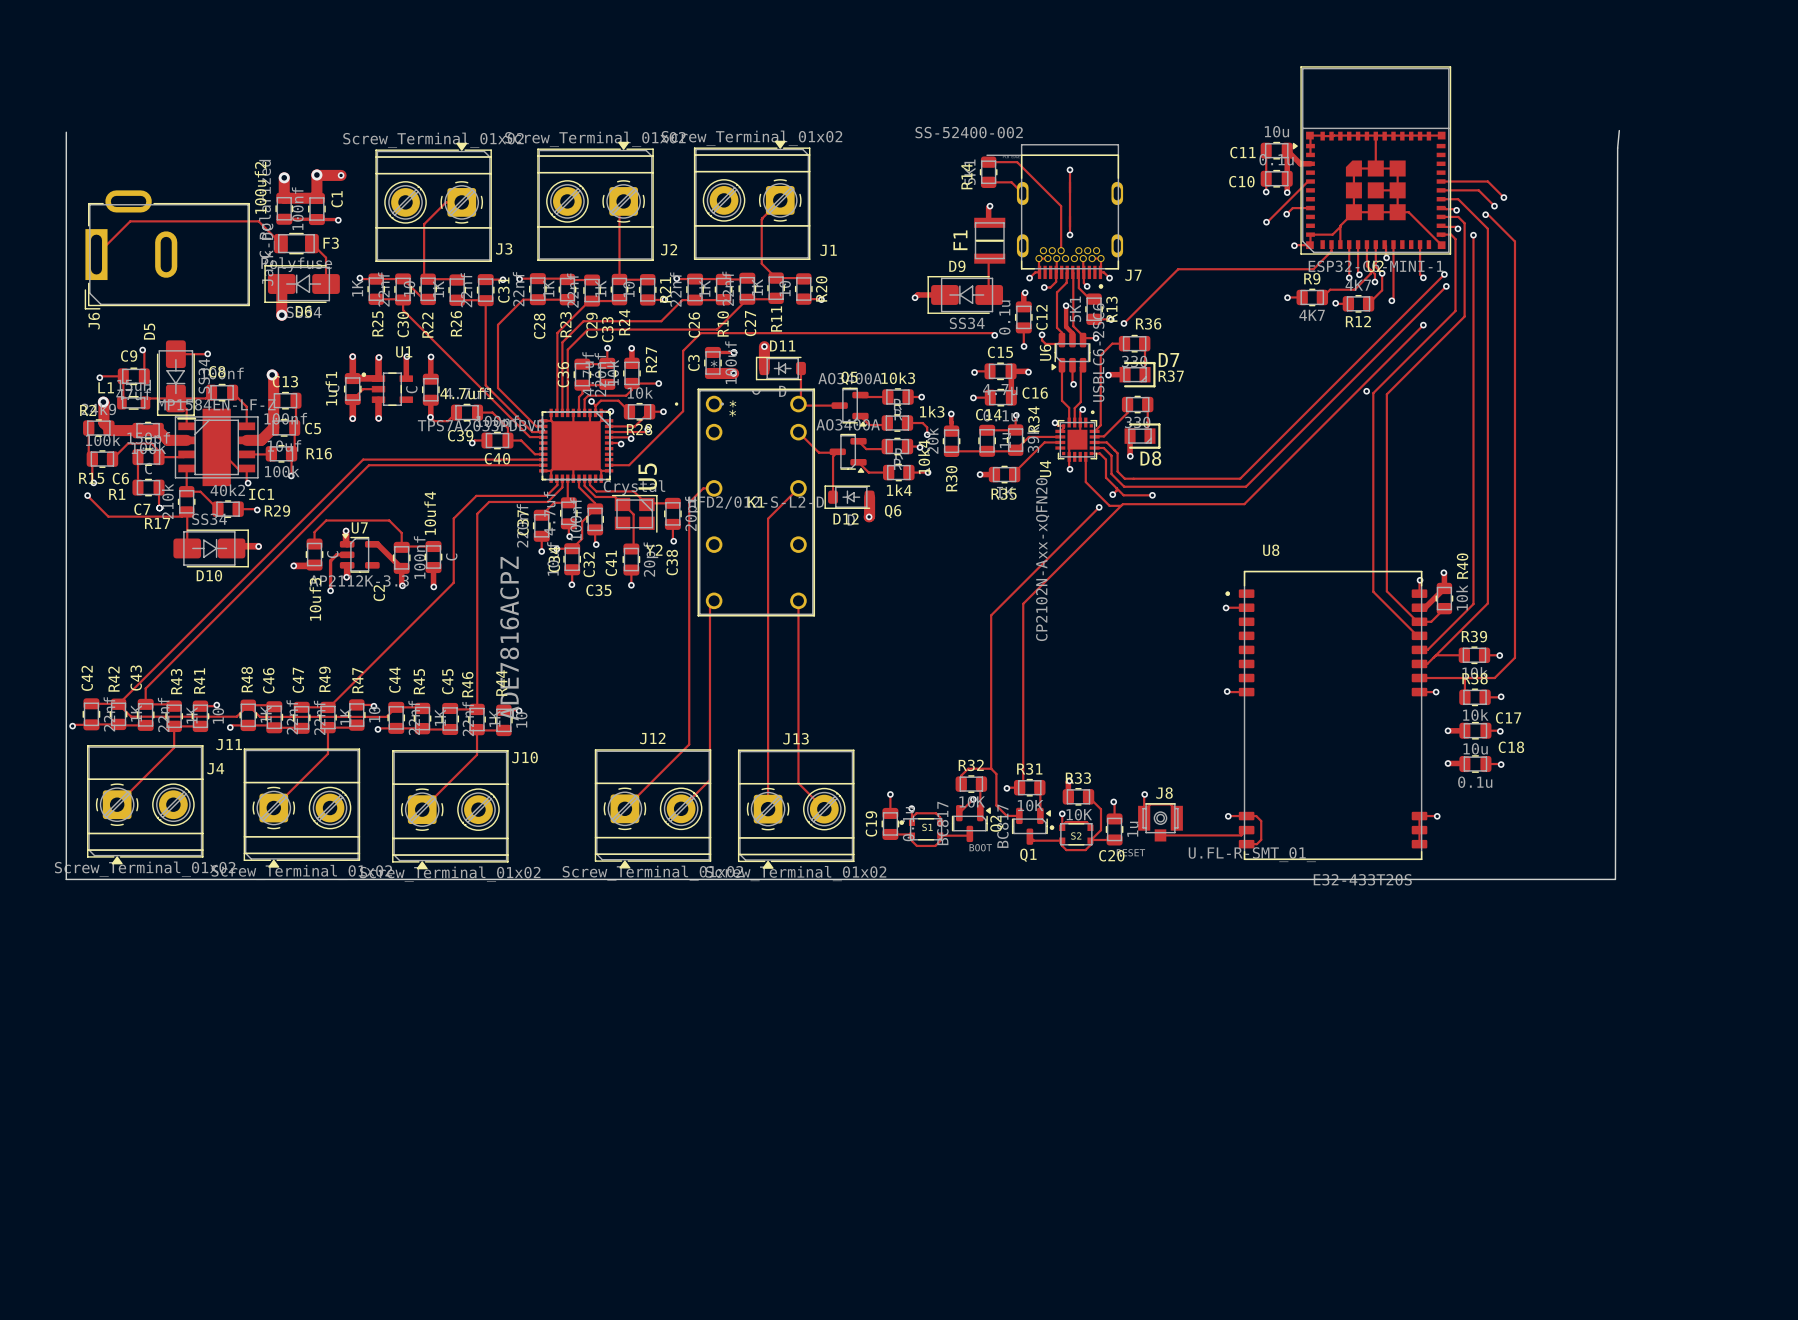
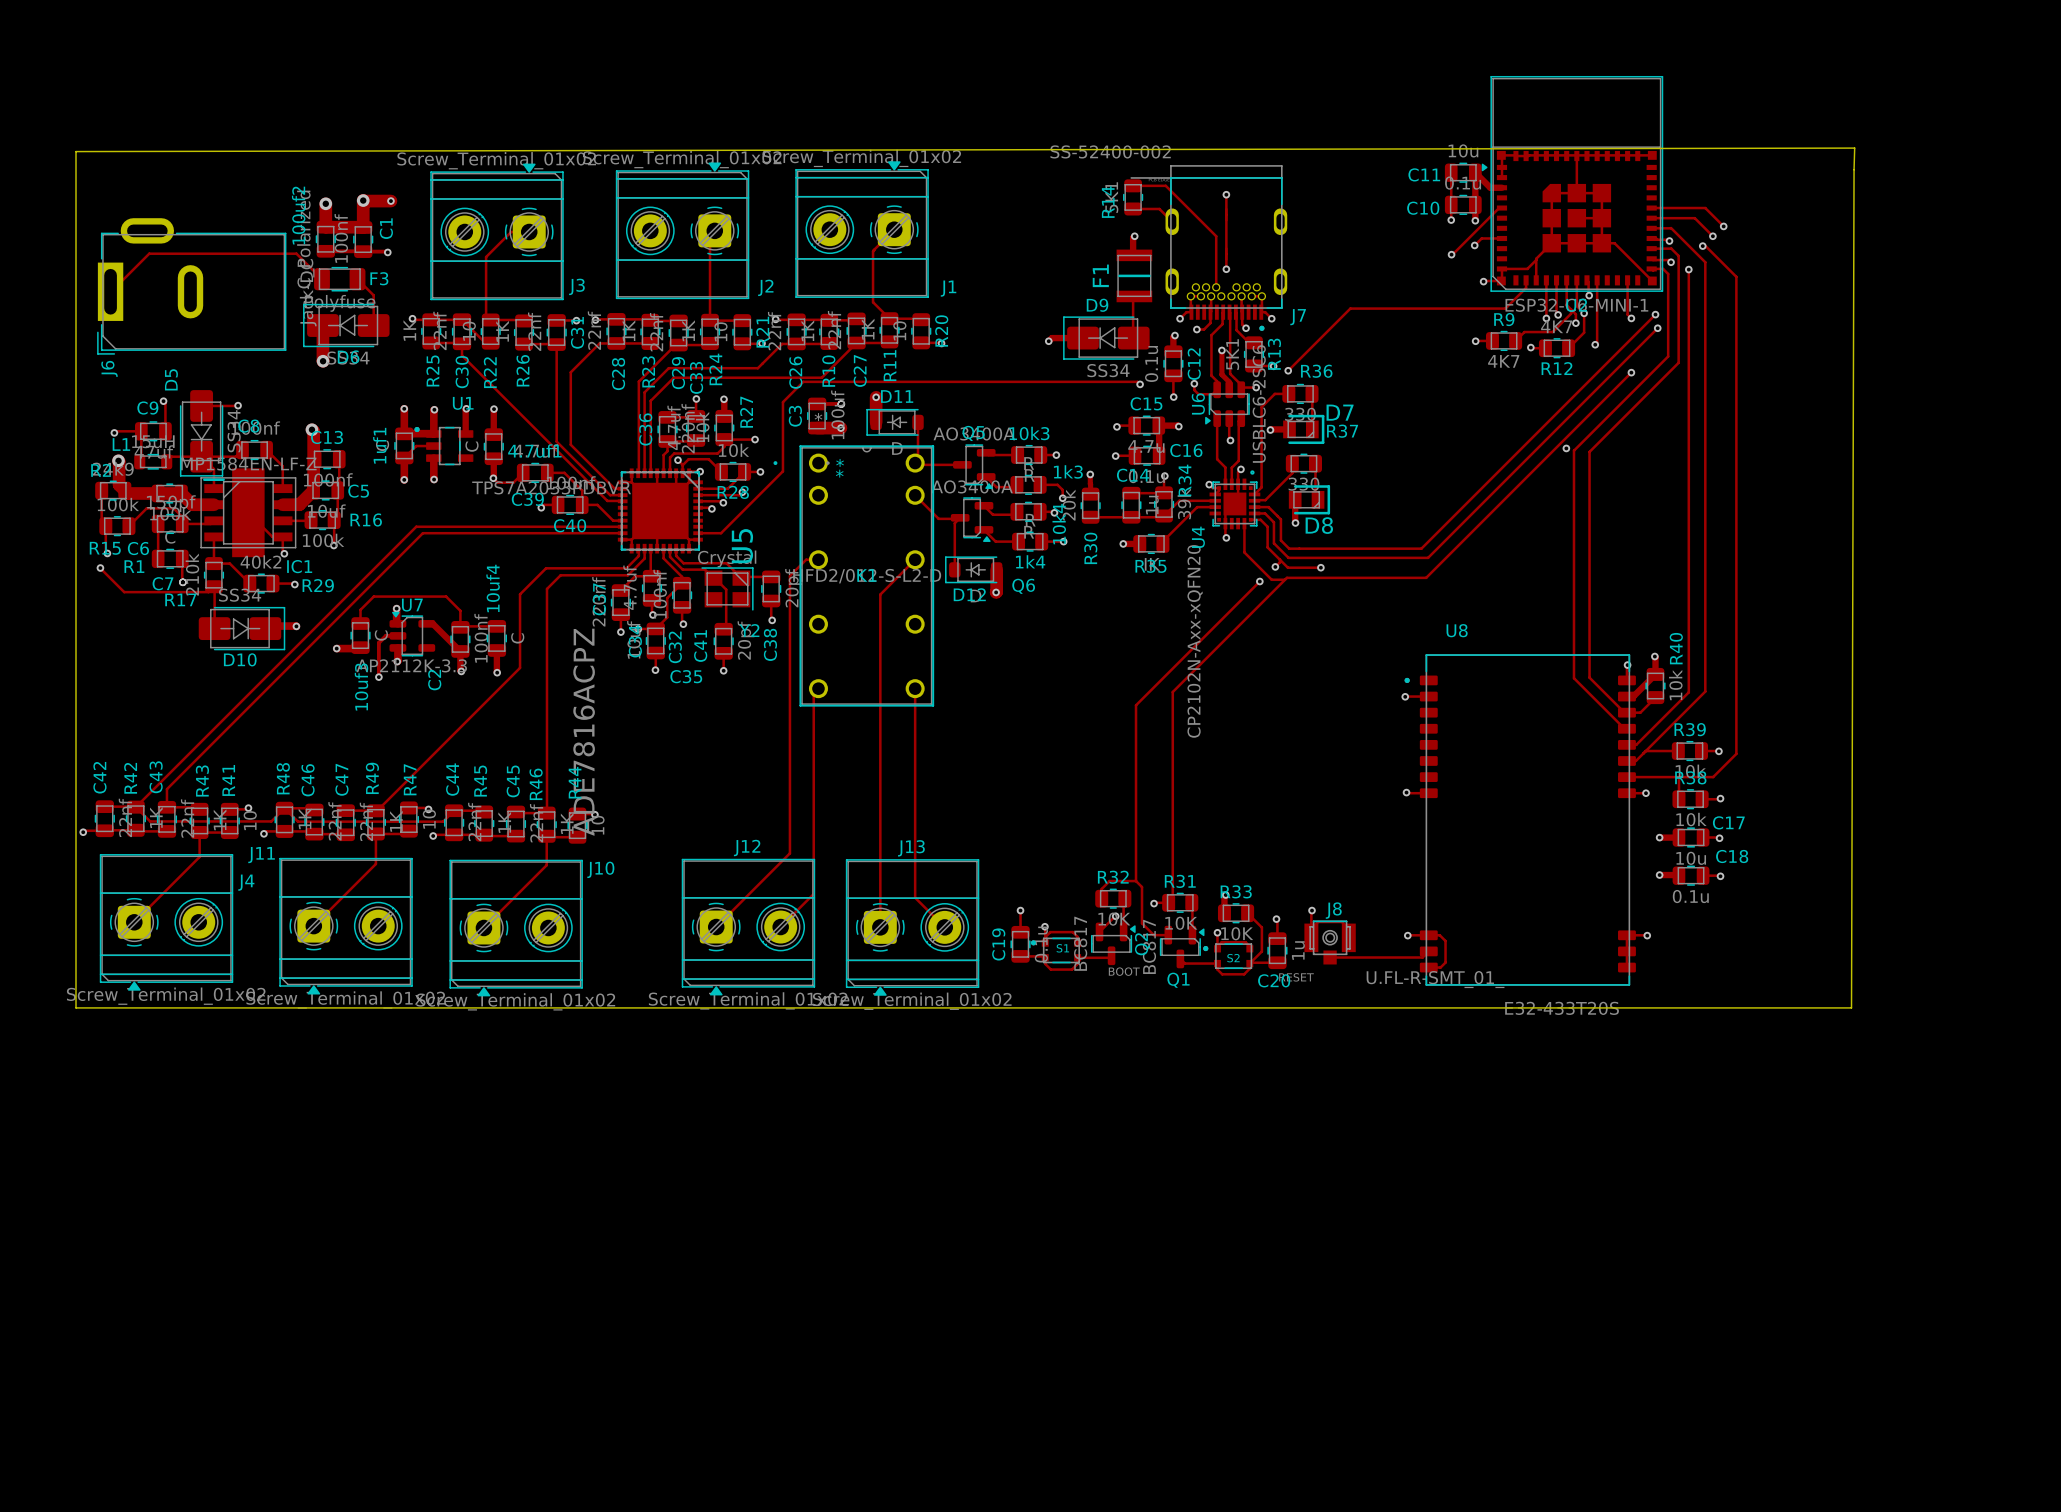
board edge: (1619, 130) (1617, 148) -> (76, 151) (1854, 148) (1854, 169)

